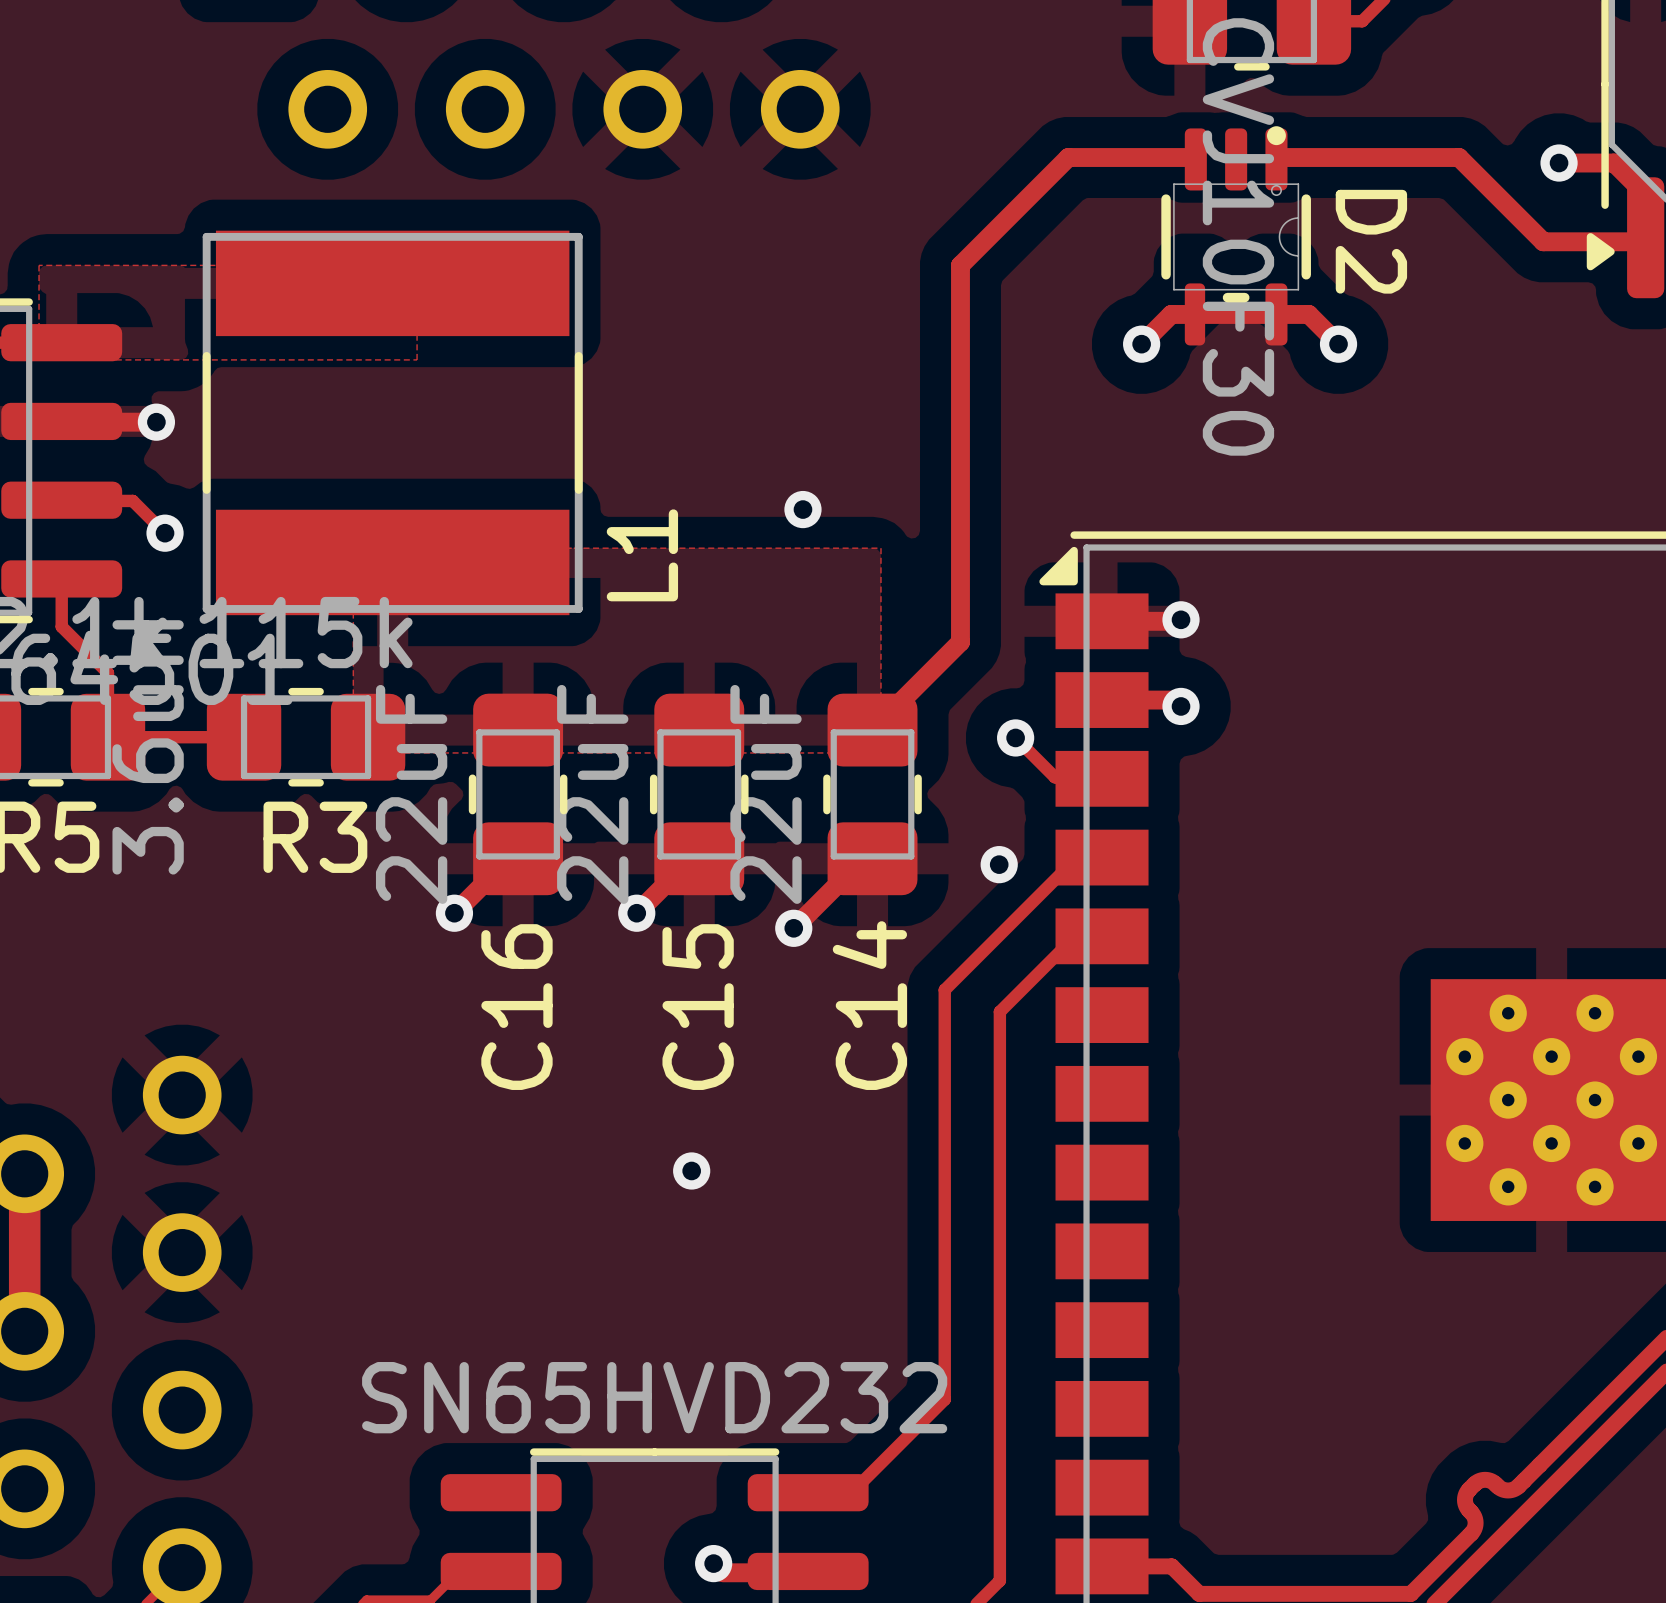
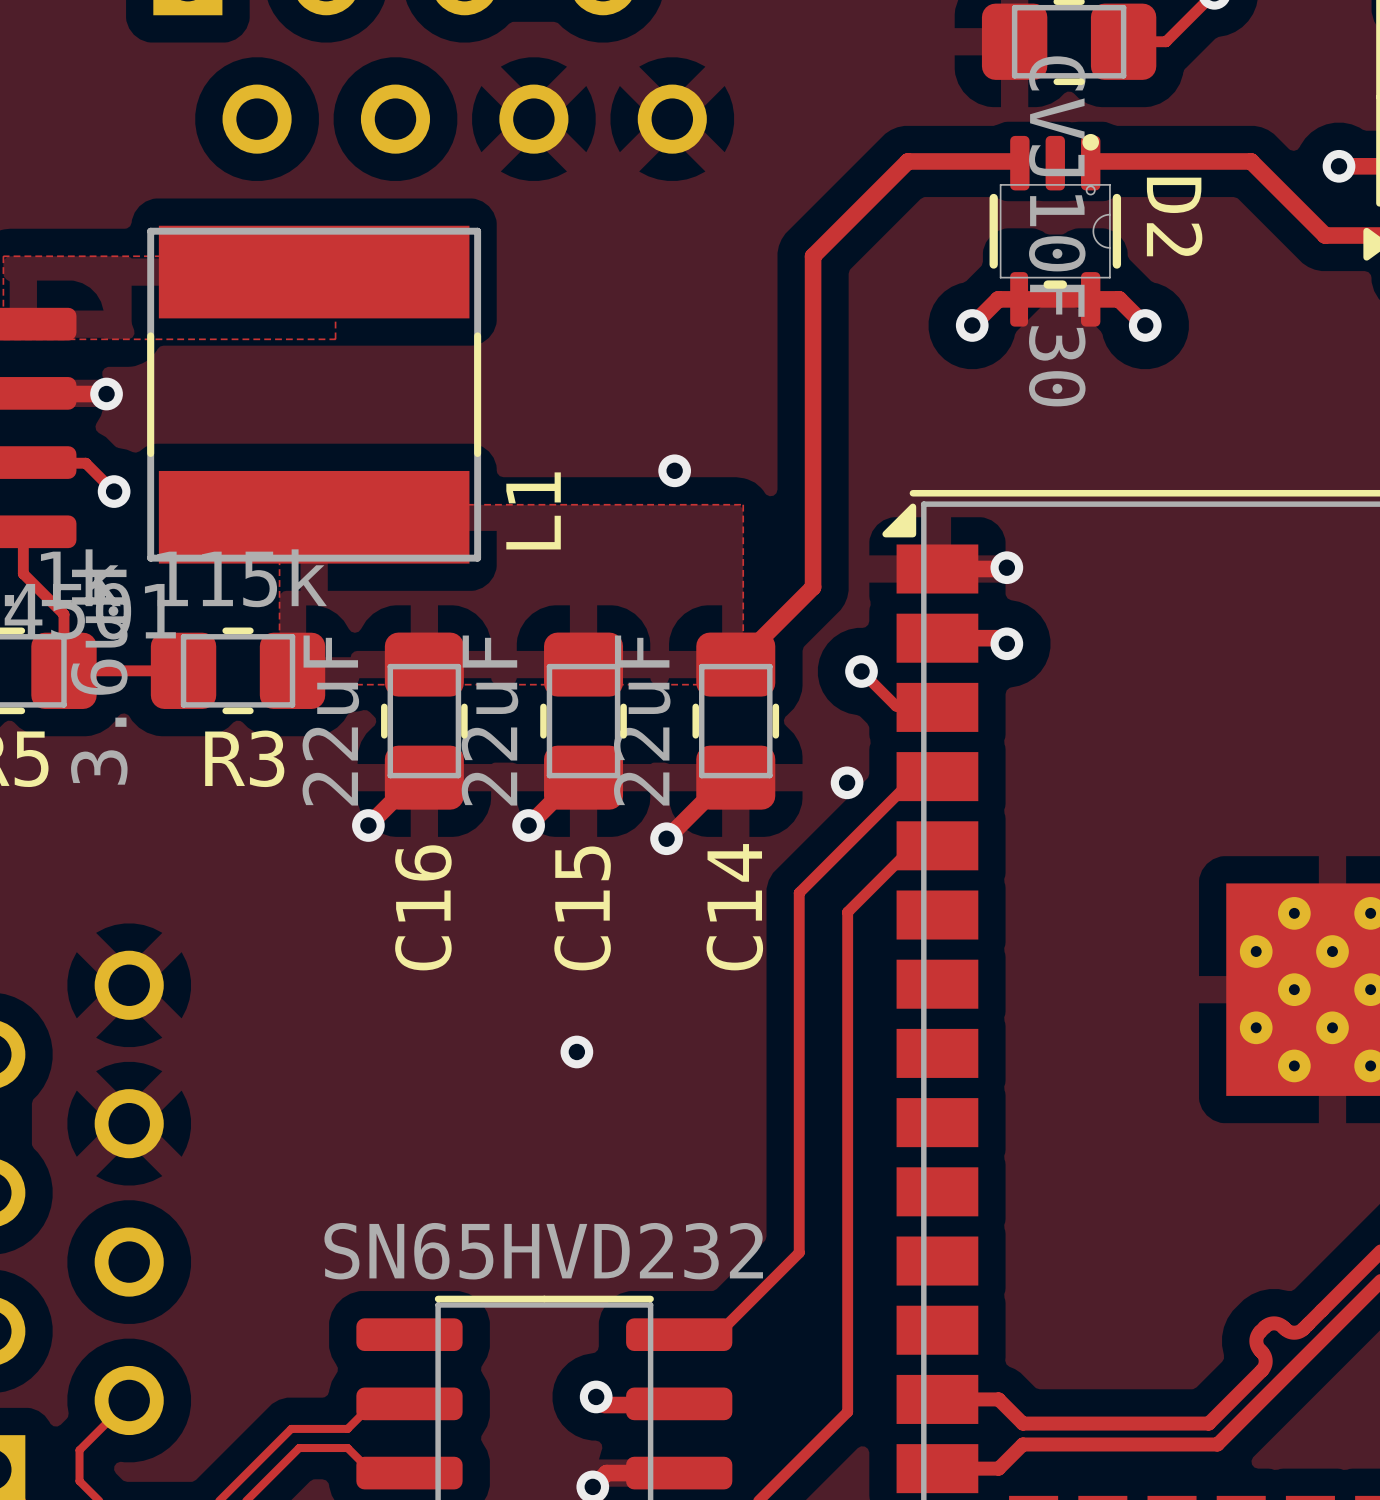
D2 name position: D2 (1371, 241) -> D2 (1174, 216)

